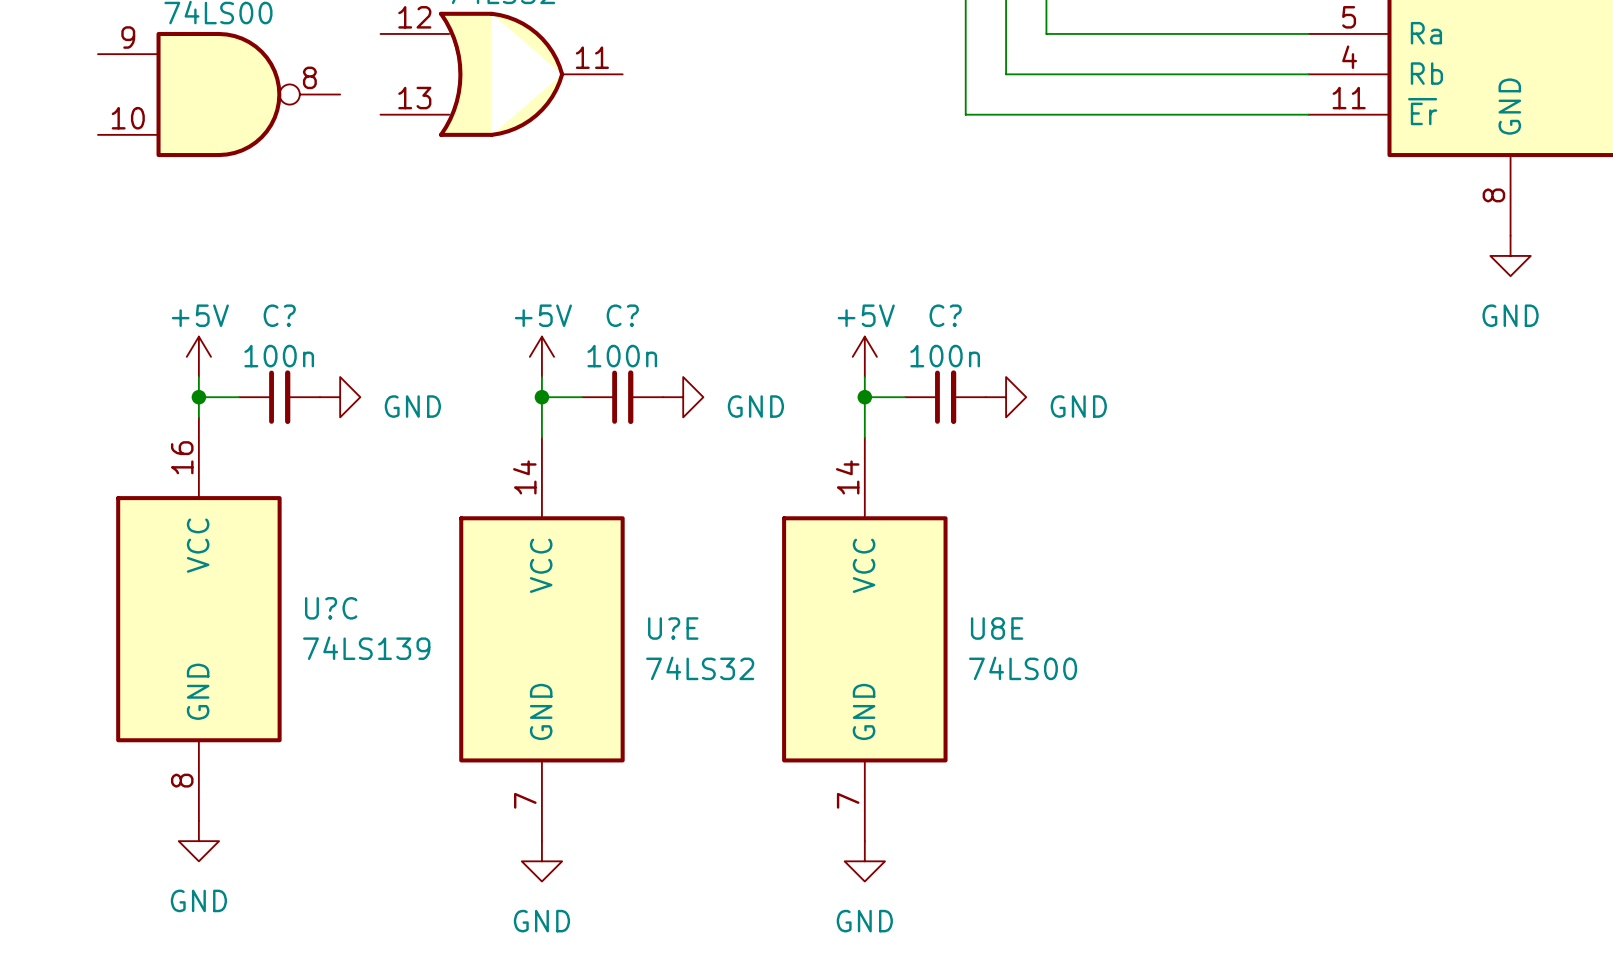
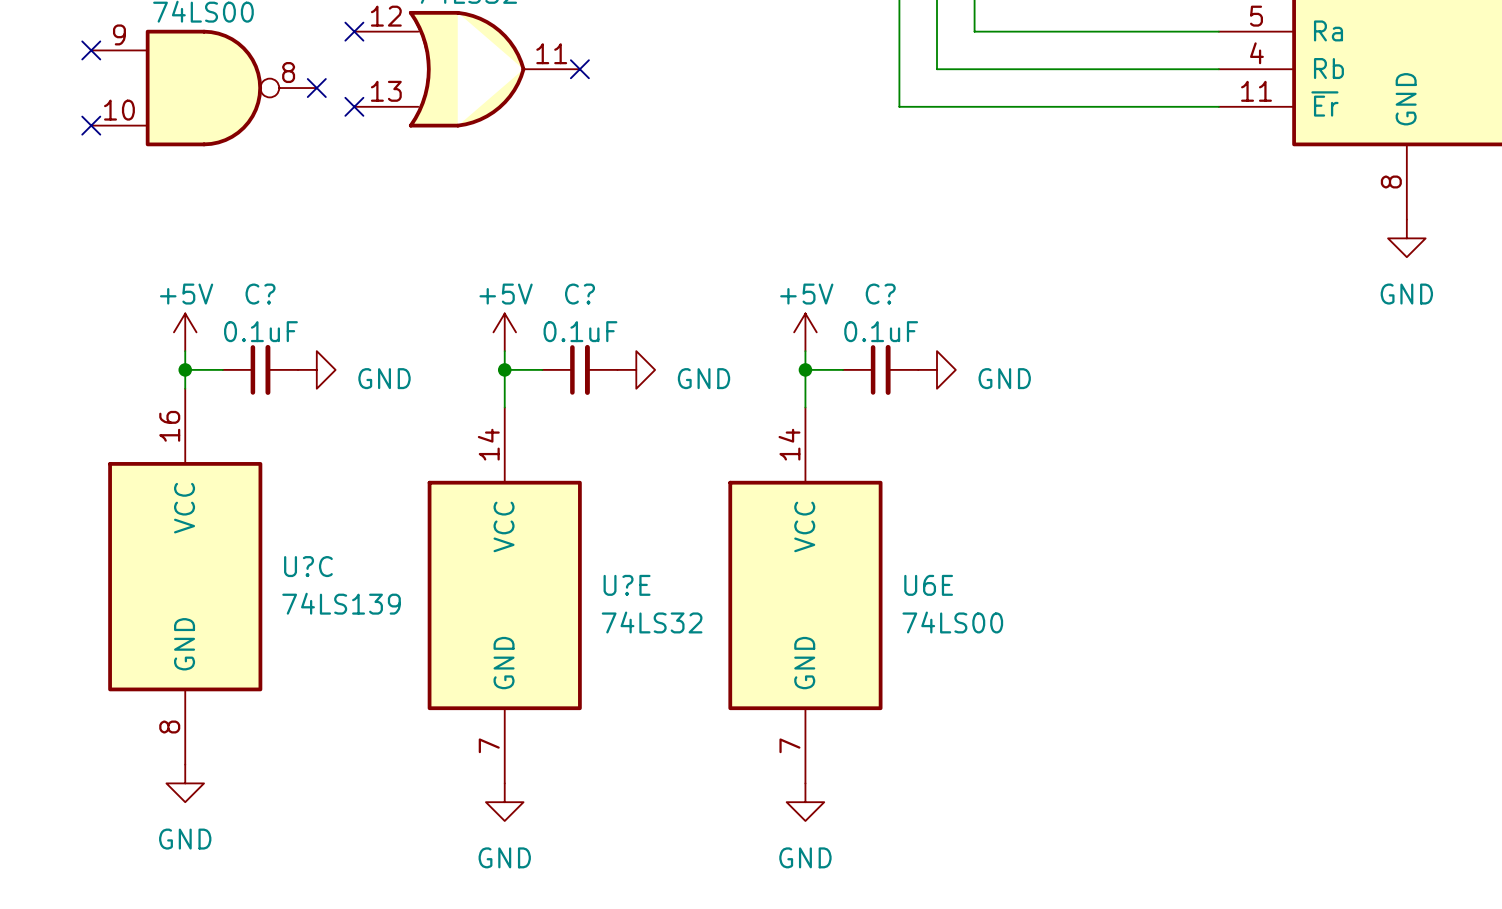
no-connect mark: none -> (354, 31)
no-connect mark: none -> (91, 50)
no-connect mark: none -> (579, 69)
no-connect mark: none -> (316, 88)
no-connect mark: none -> (354, 106)
no-connect mark: none -> (91, 125)
C? value: 100n (279, 356) -> 0.1uF (260, 331)
C? value: 100n (622, 356) -> 0.1uF (580, 331)
C? value: 100n (945, 356) -> 0.1uF (881, 331)
U8E name: U8E (997, 628) -> U6E (928, 585)

